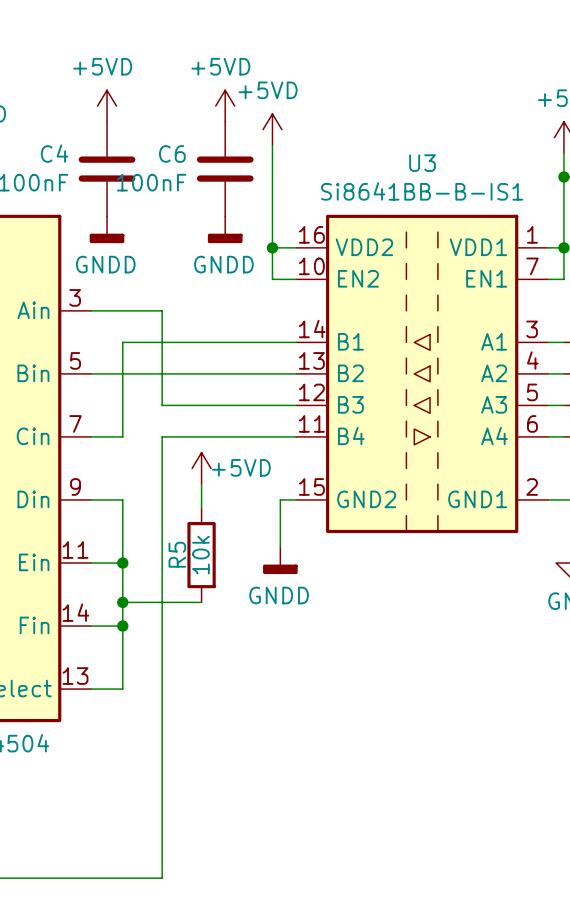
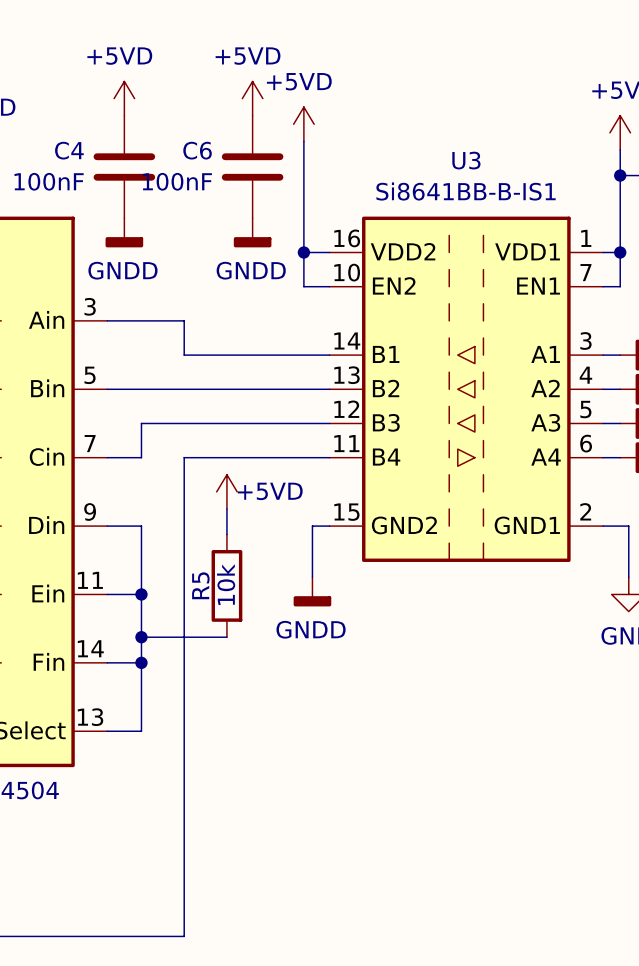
wire: (122, 405) (122, 342) (162, 342) (162, 405) -> (141, 423) (184, 423)

